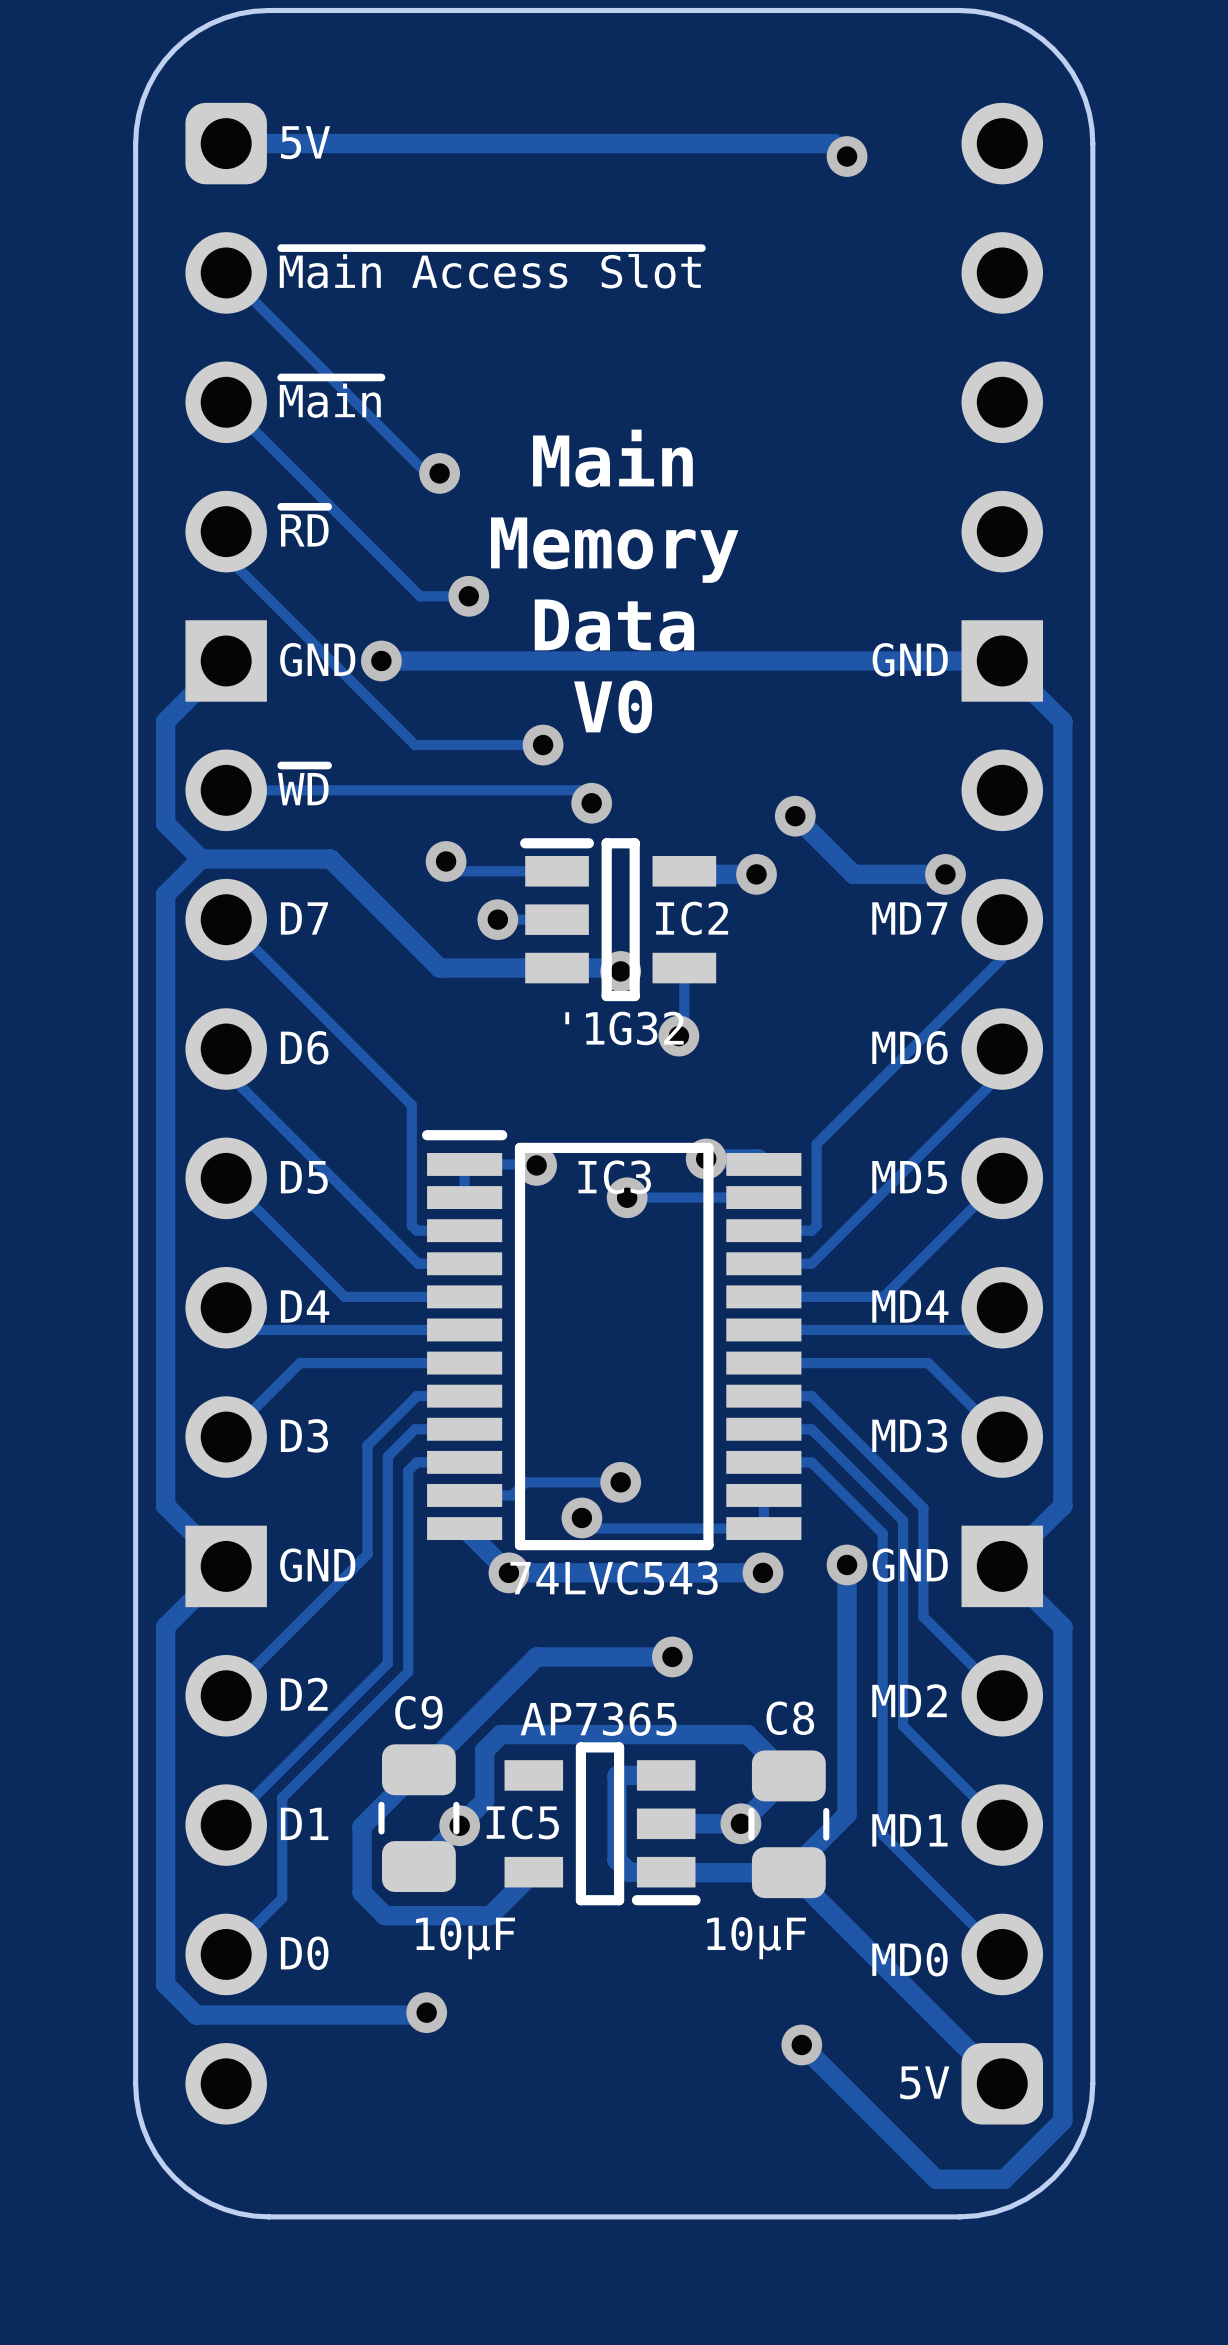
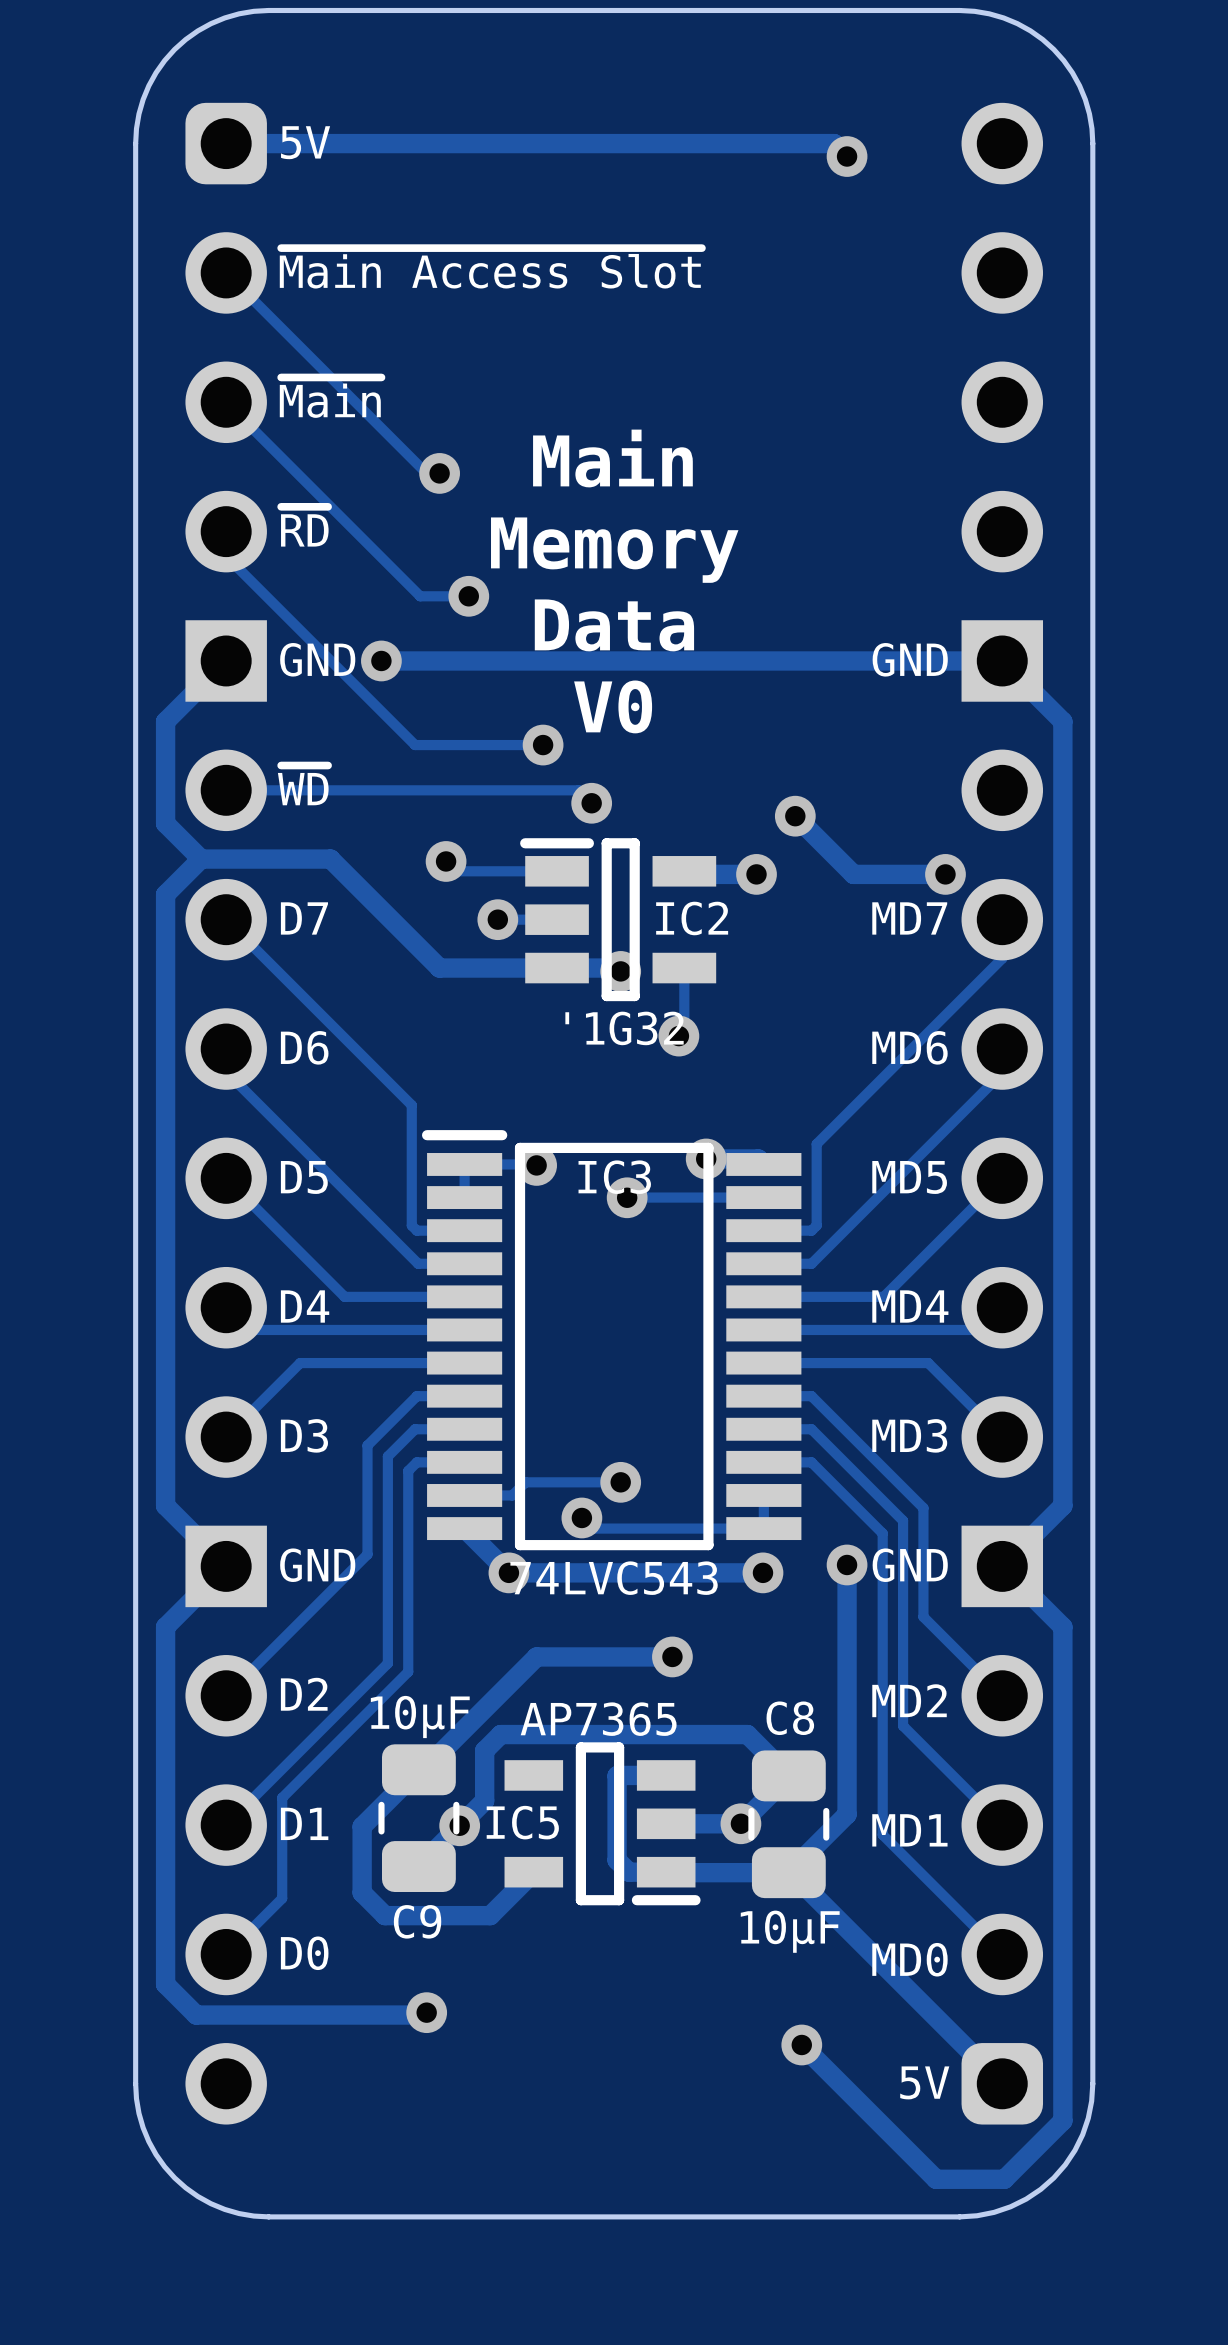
C9 name position: C9 (418, 1712) -> C9 (417, 1921)
C9 value position: 10µF (465, 1938) -> 10µF (420, 1717)
C8 value position: 10µF (756, 1938) -> 10µF (790, 1931)

